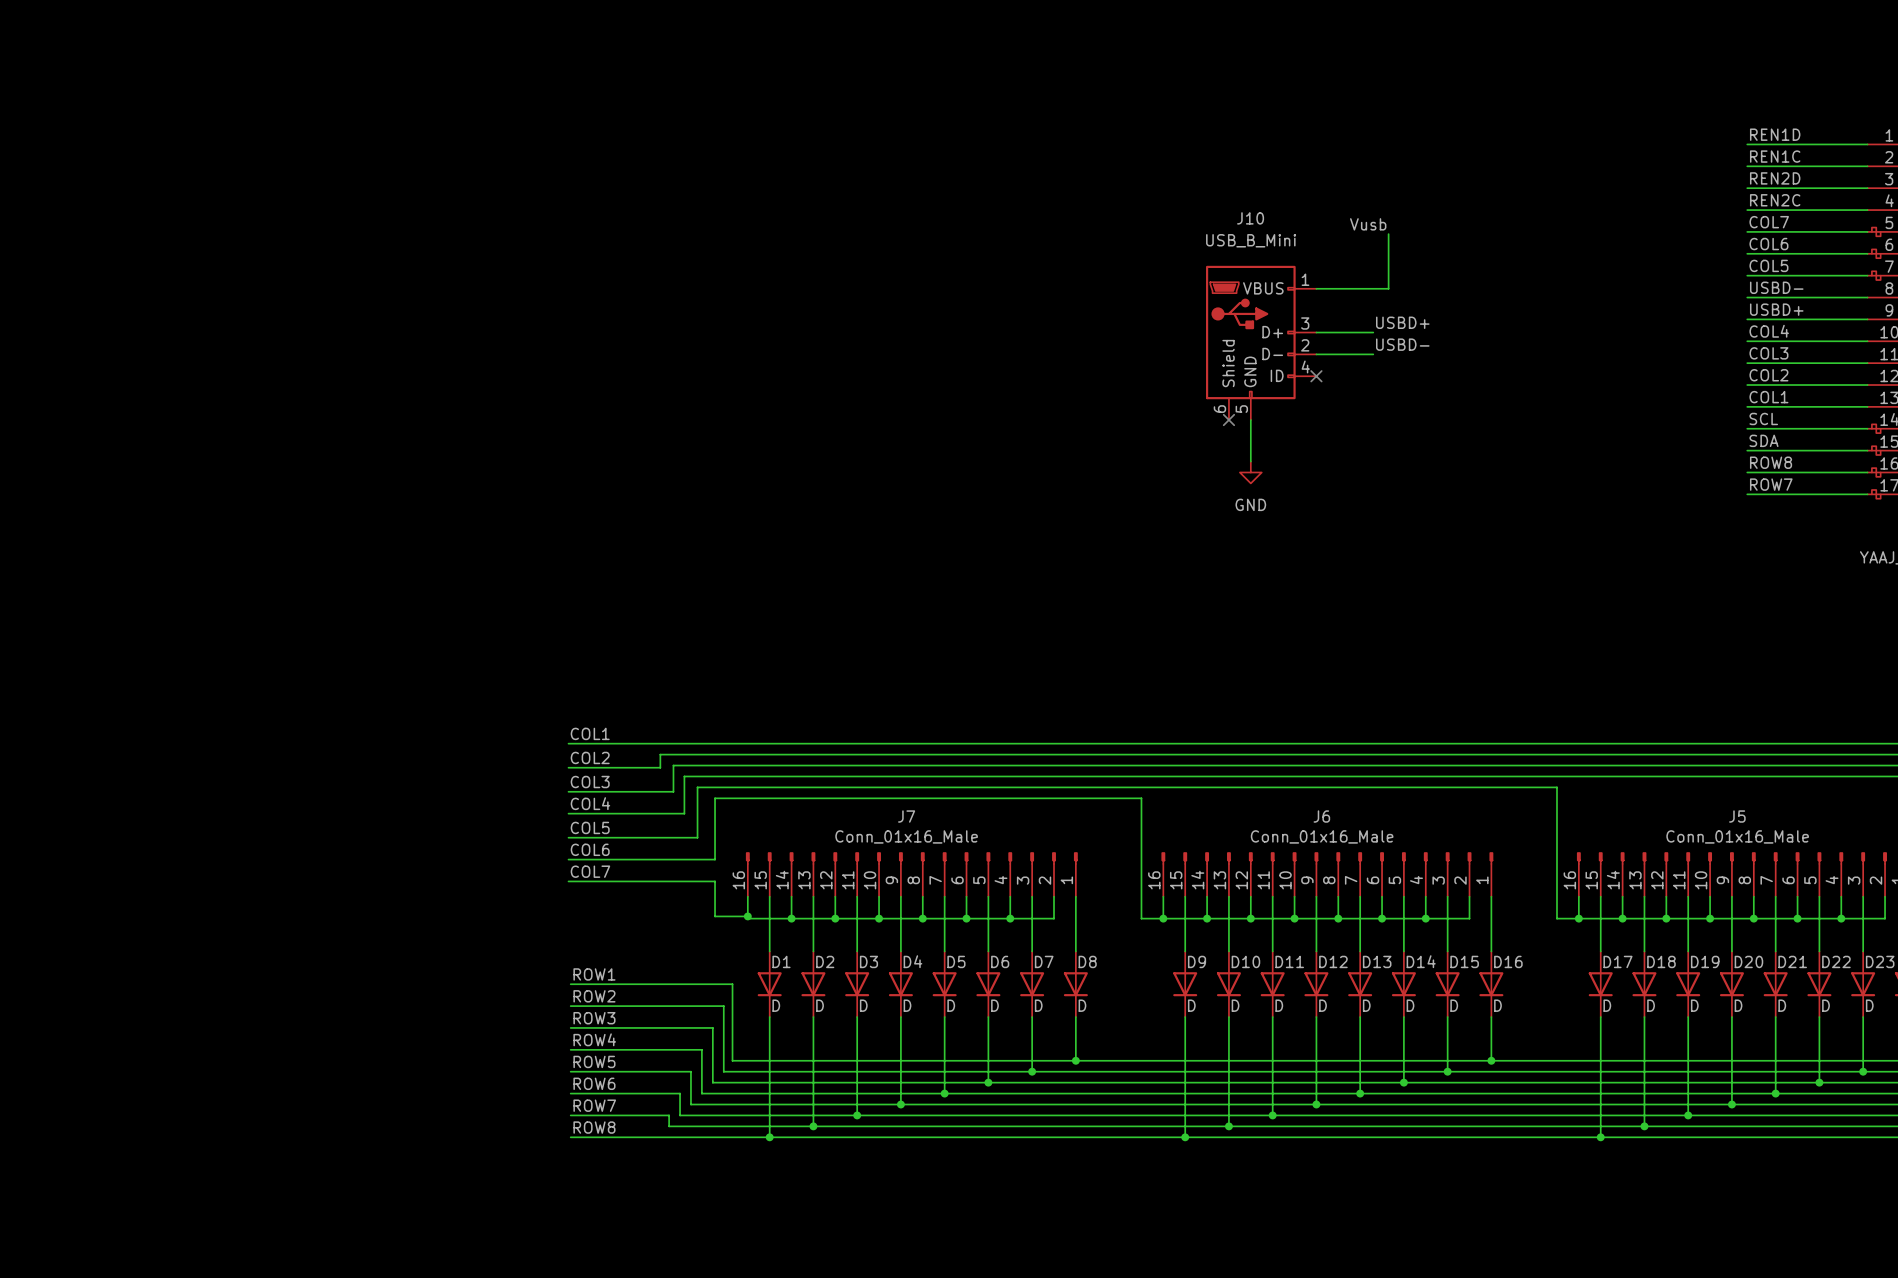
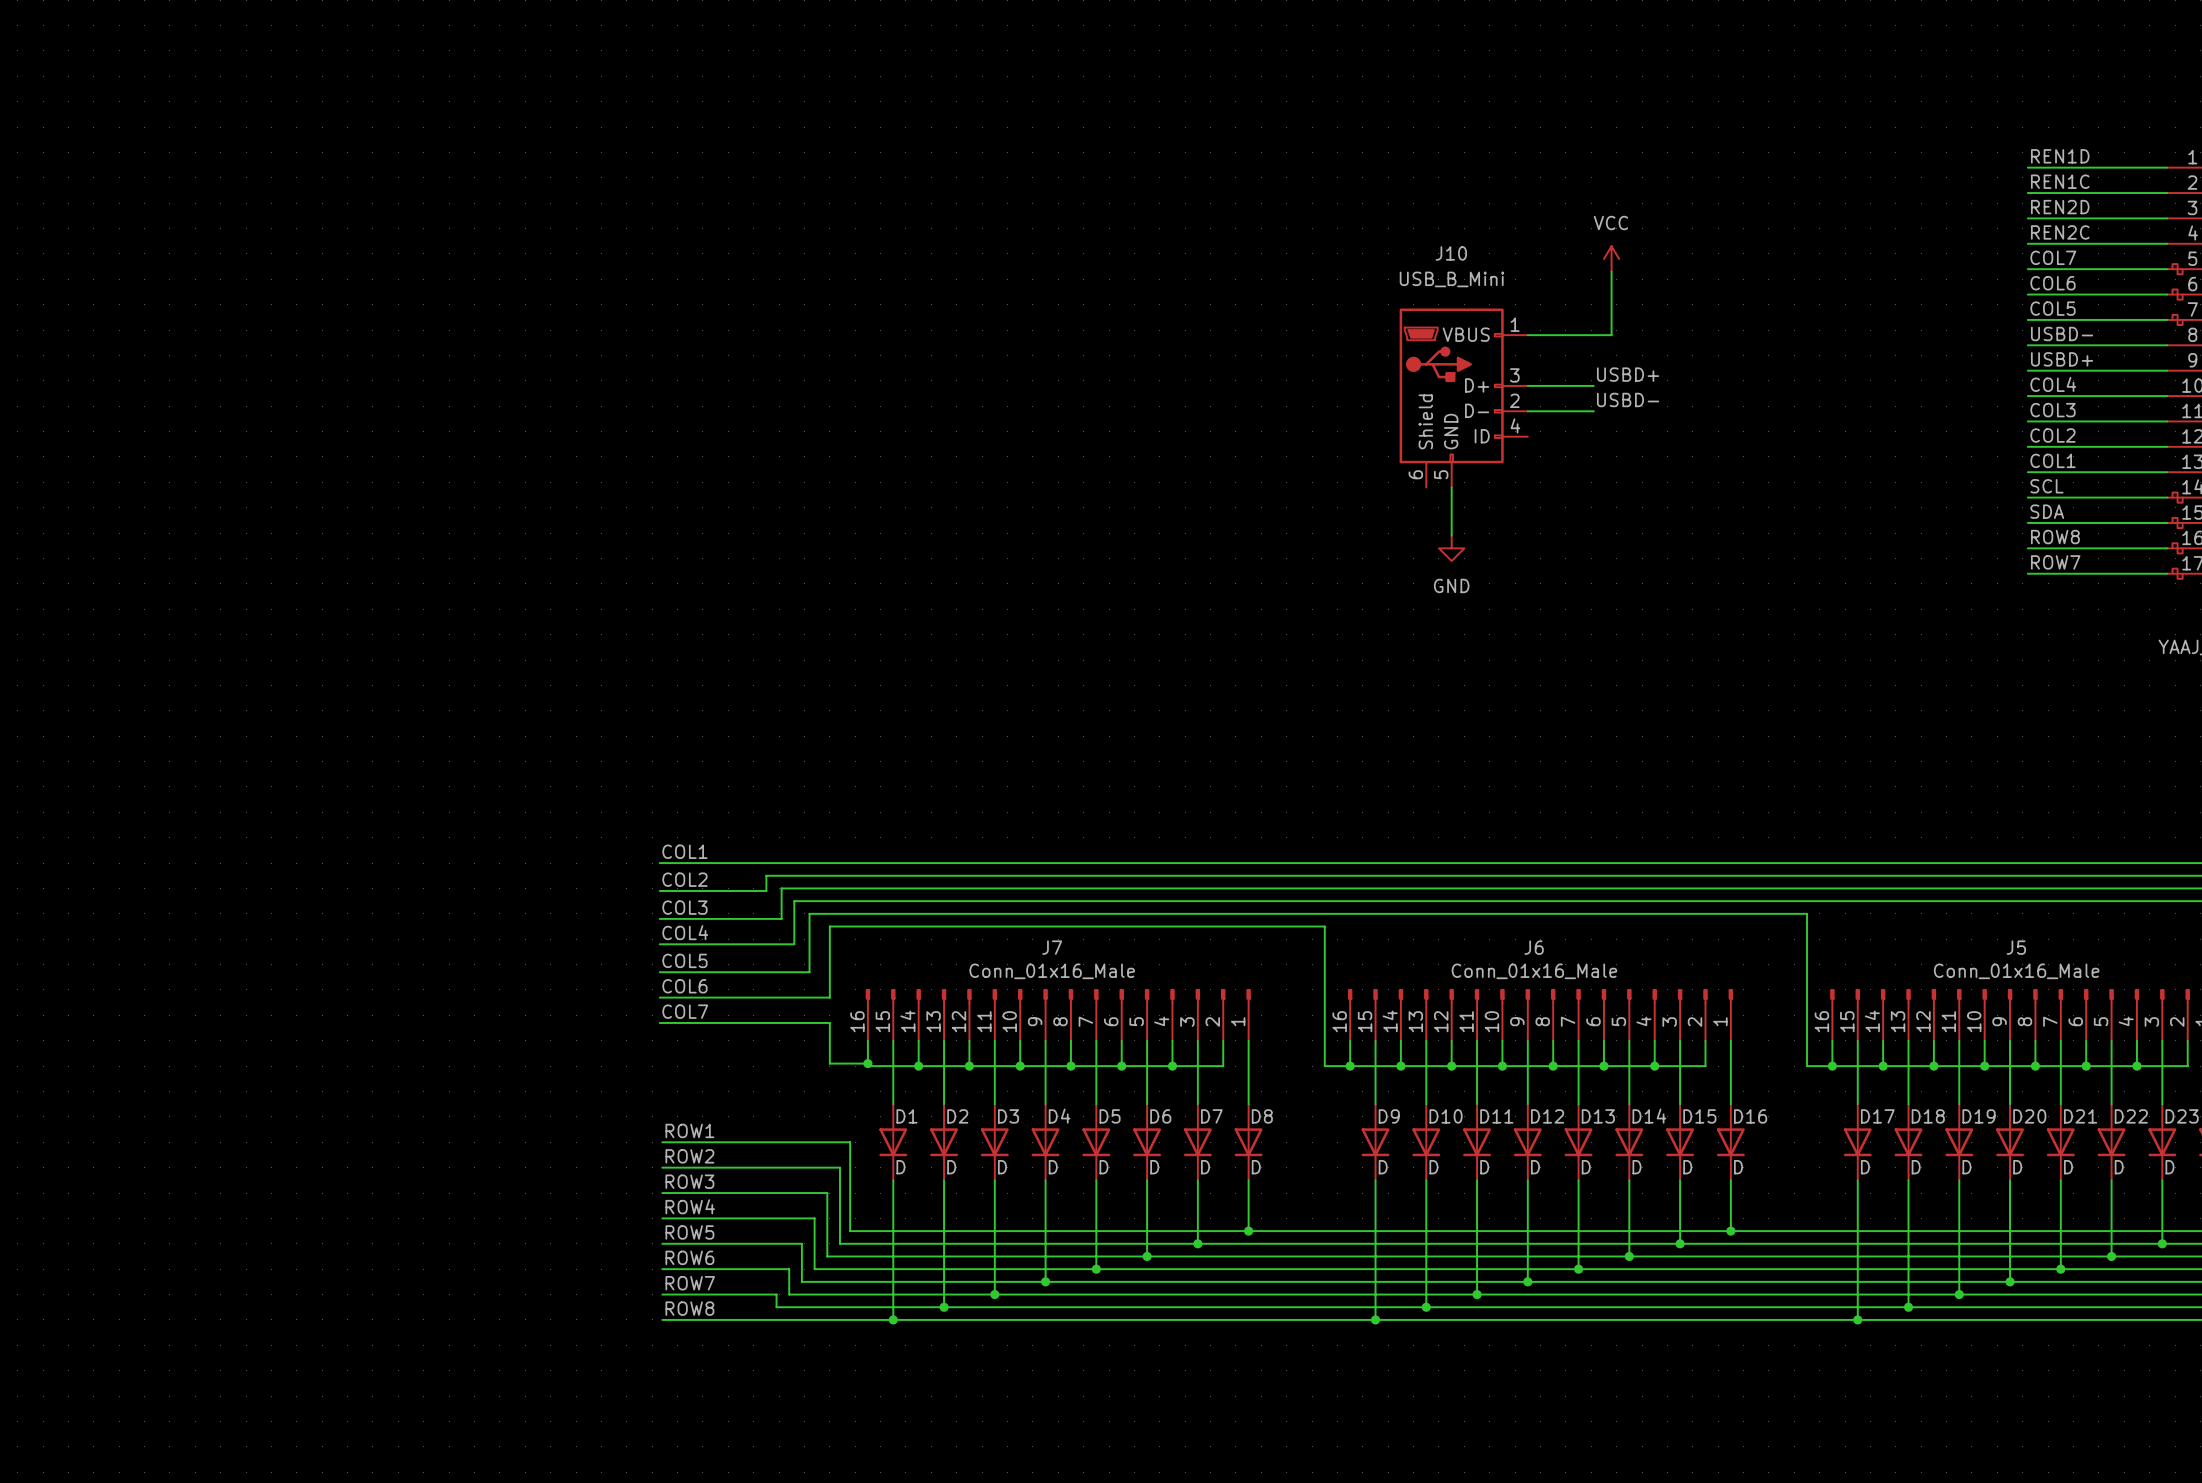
power symbol: none -> VCC (1611, 259)
label: Vusb (1368, 224) -> none
no-connect mark: (1316, 376) -> none
no-connect mark: (1228, 420) -> none

